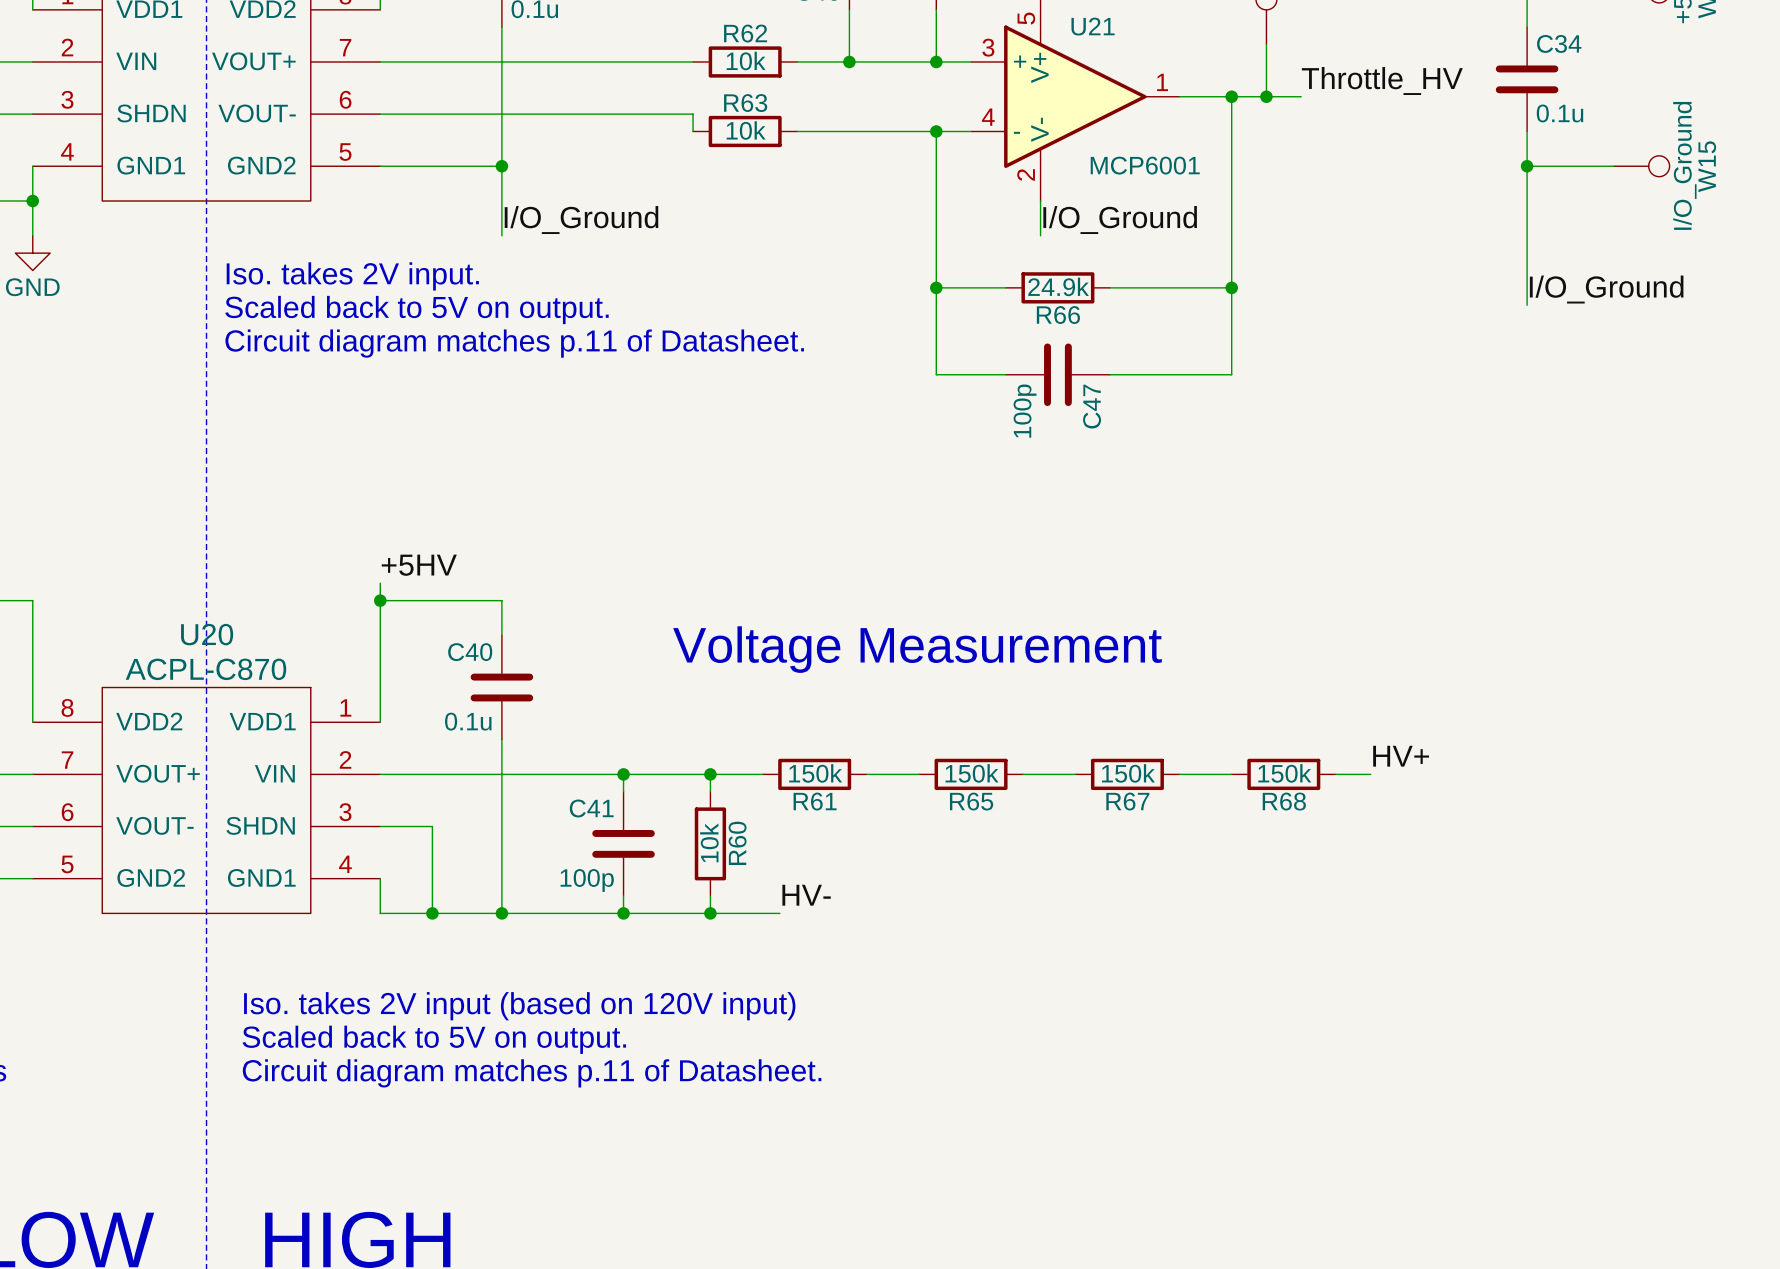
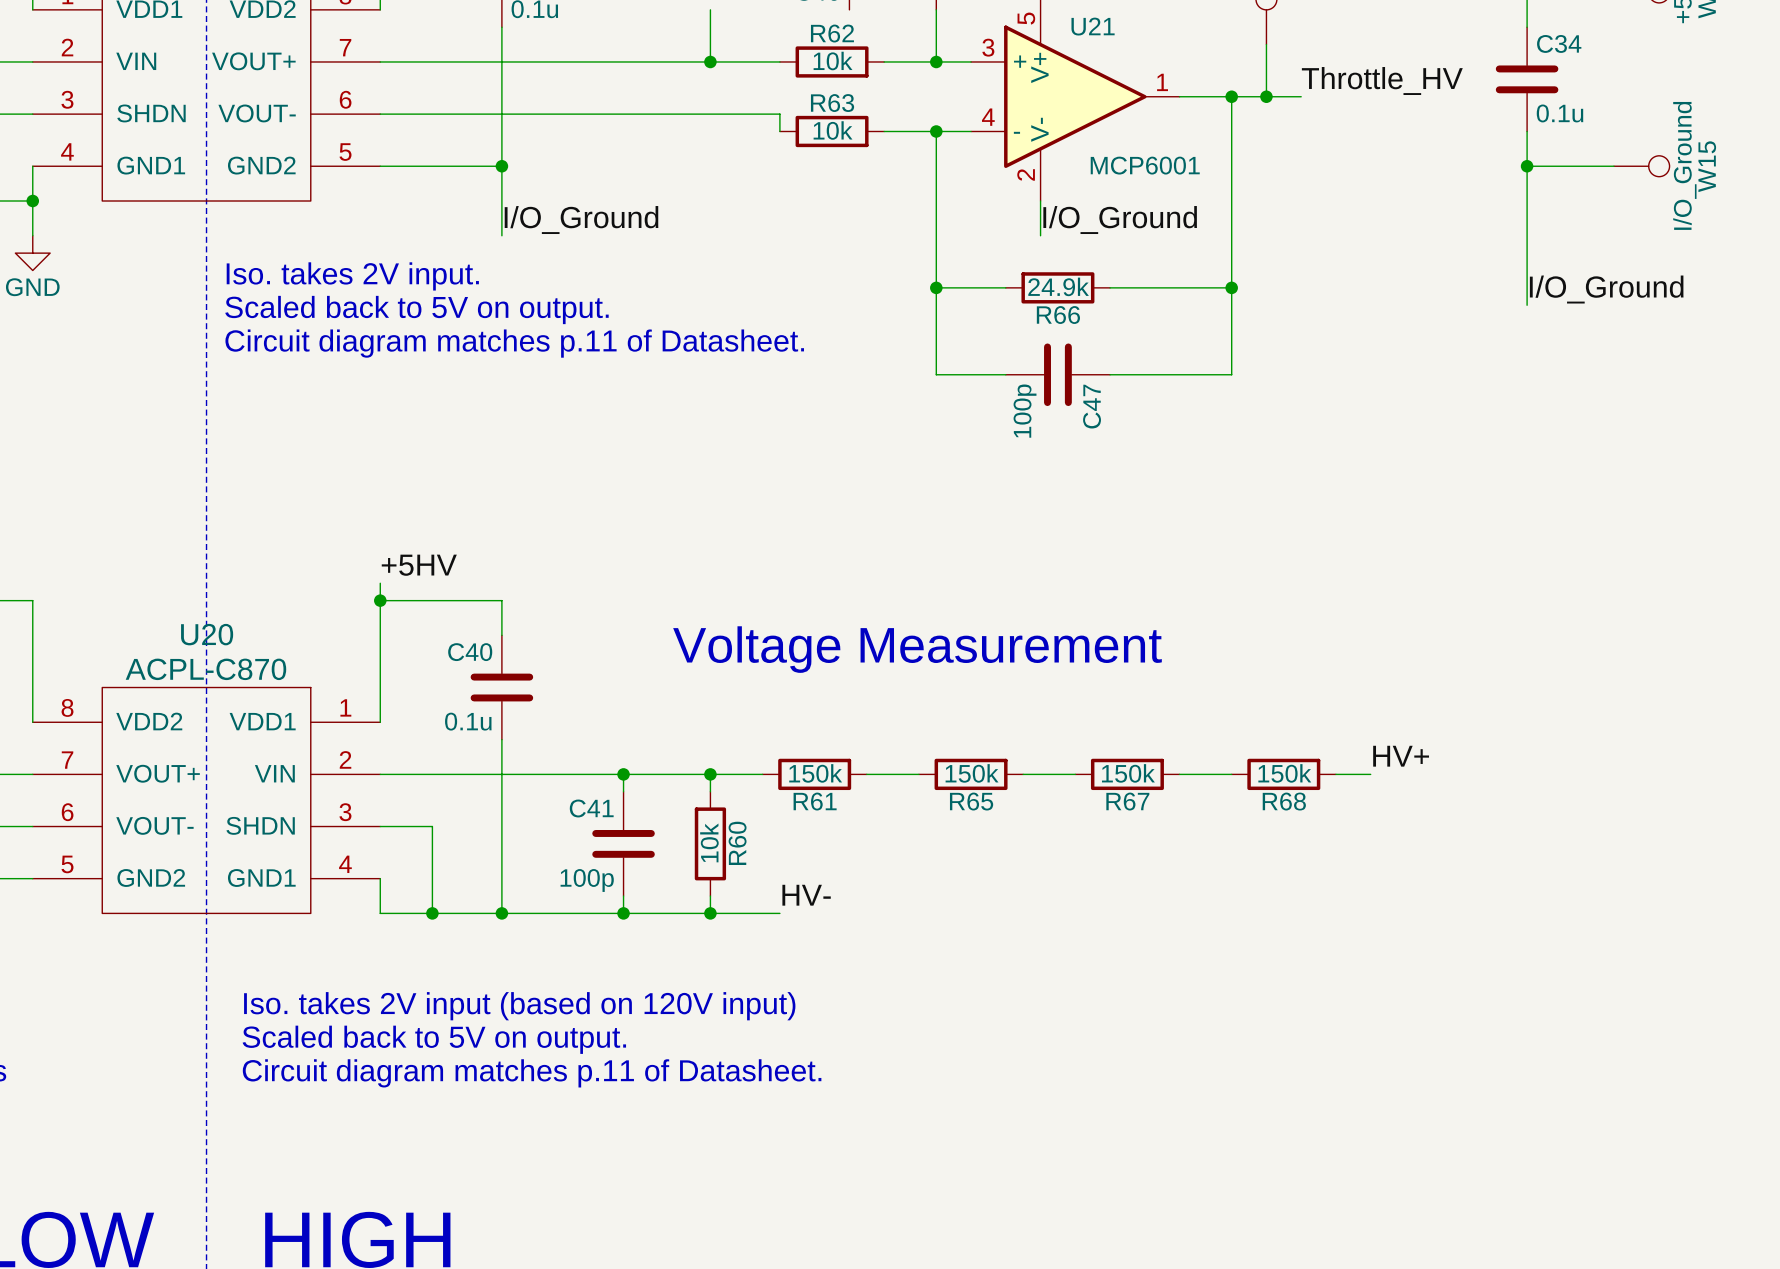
wire: (849, 9) (849, 61) -> (710, 9) (710, 61)
junction: none -> (710, 61)
R62 position: (745, 61) -> (832, 61)
wire: (797, 61) (884, 61) -> (693, 61) (779, 61)
junction: (849, 61) -> none
wire: (693, 114) (693, 131) -> (693, 114) (779, 114) (779, 131)
R63 position: (745, 131) -> (832, 131)
wire: (797, 131) (884, 131) -> none

